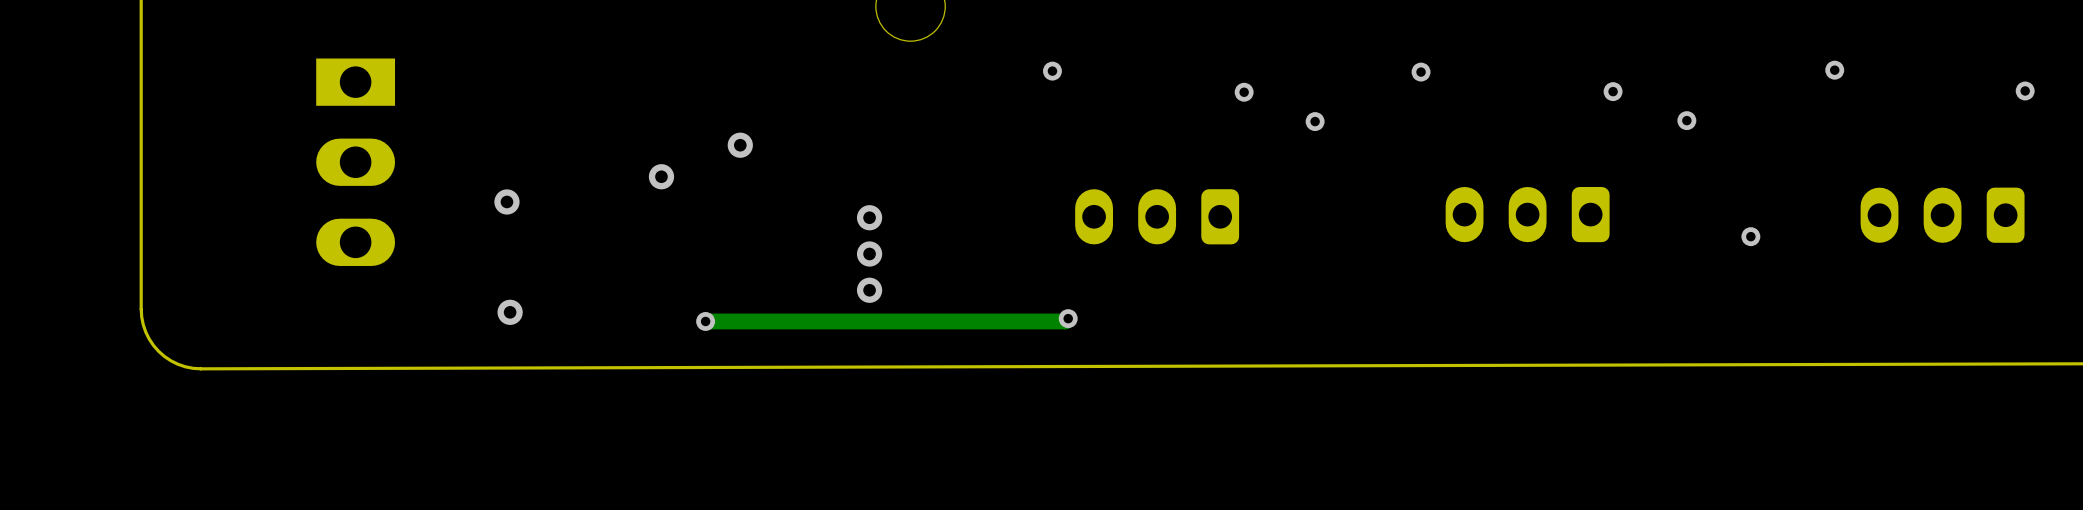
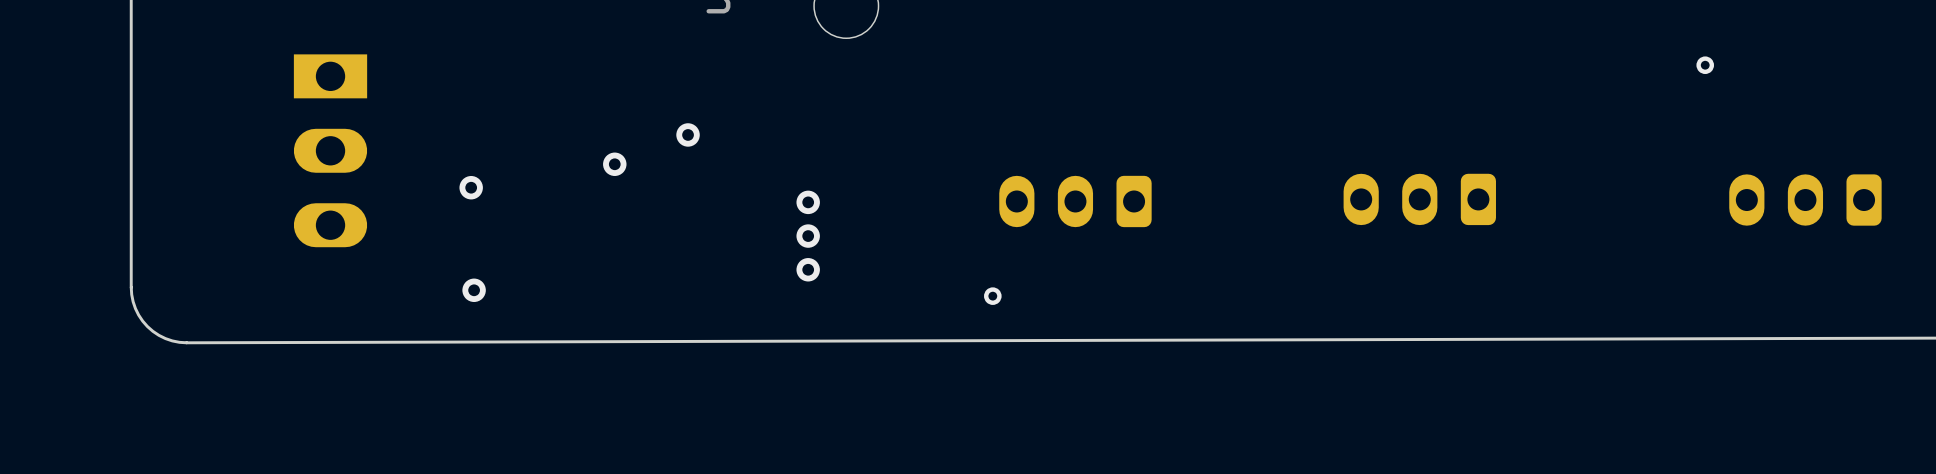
via: (1052, 71) -> none
via: (1421, 72) -> none
via: (2025, 90) -> none
via: (1613, 91) -> none
via: (1244, 92) -> none
via: (1686, 120) -> none
via: (1315, 121) -> none
via: (1750, 236) -> none
track: (1068, 318) (1065, 321) (705, 321) -> none
via: (705, 321) -> none

